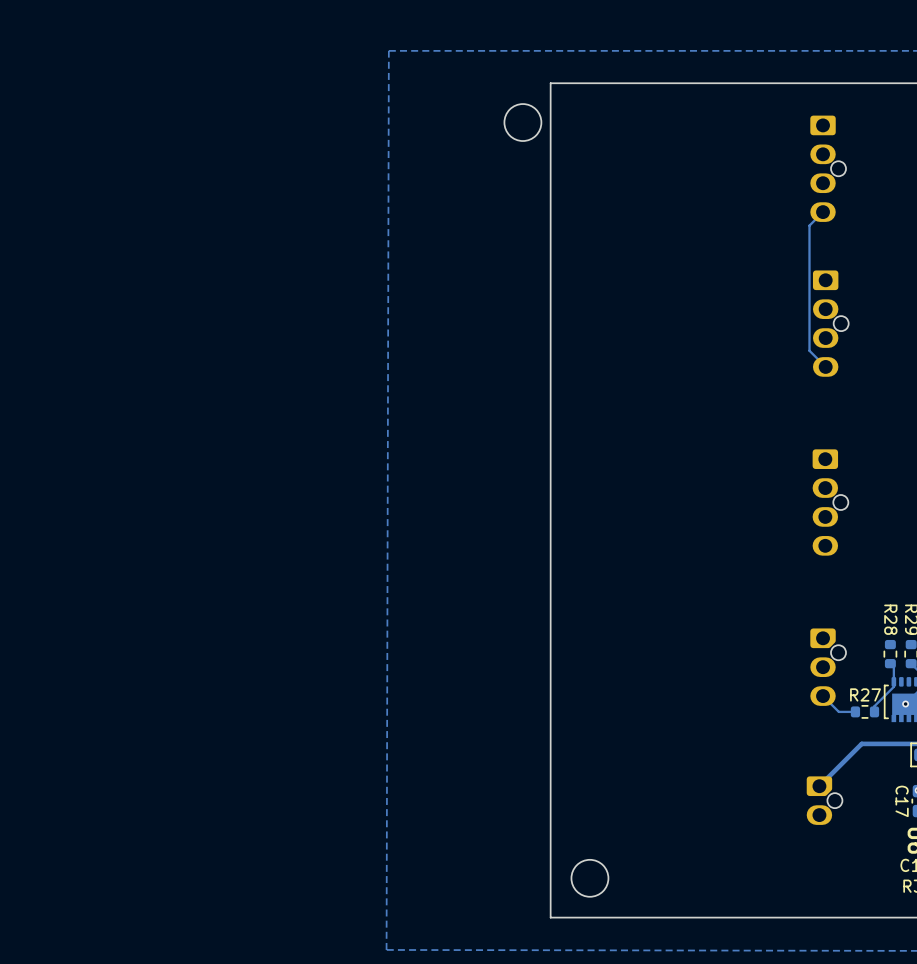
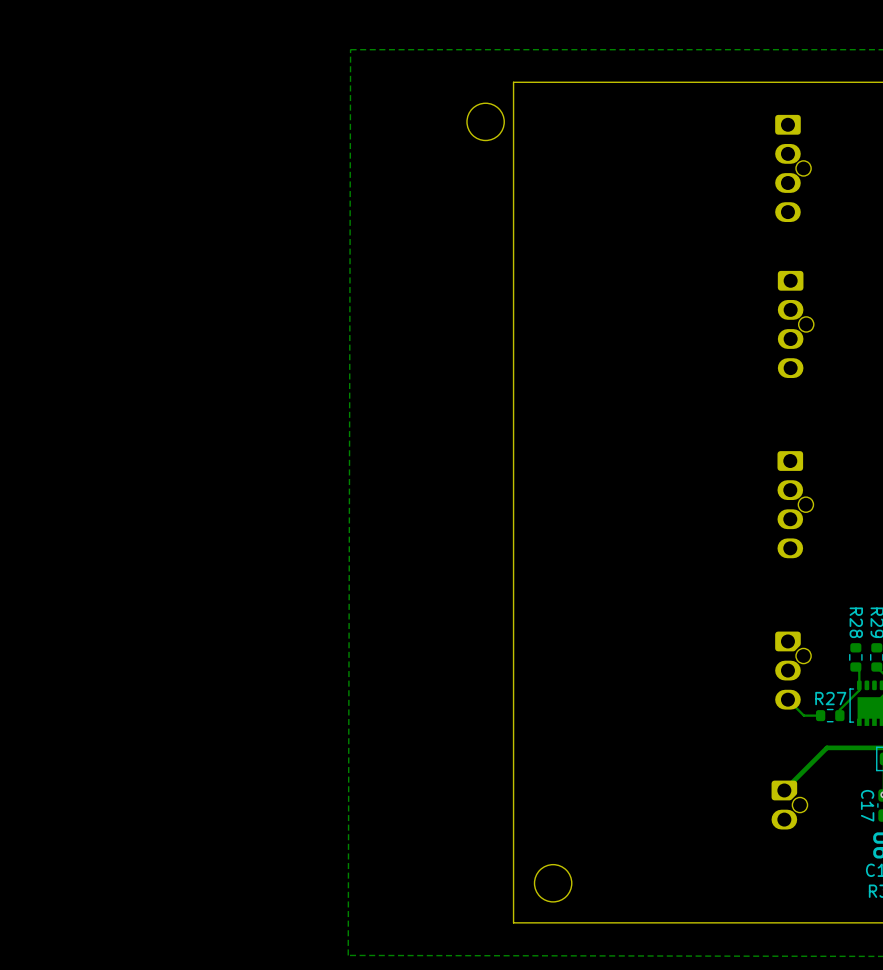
track: (823, 212) (809, 225) (809, 350) (825, 366) -> none
via: (905, 704) -> none

